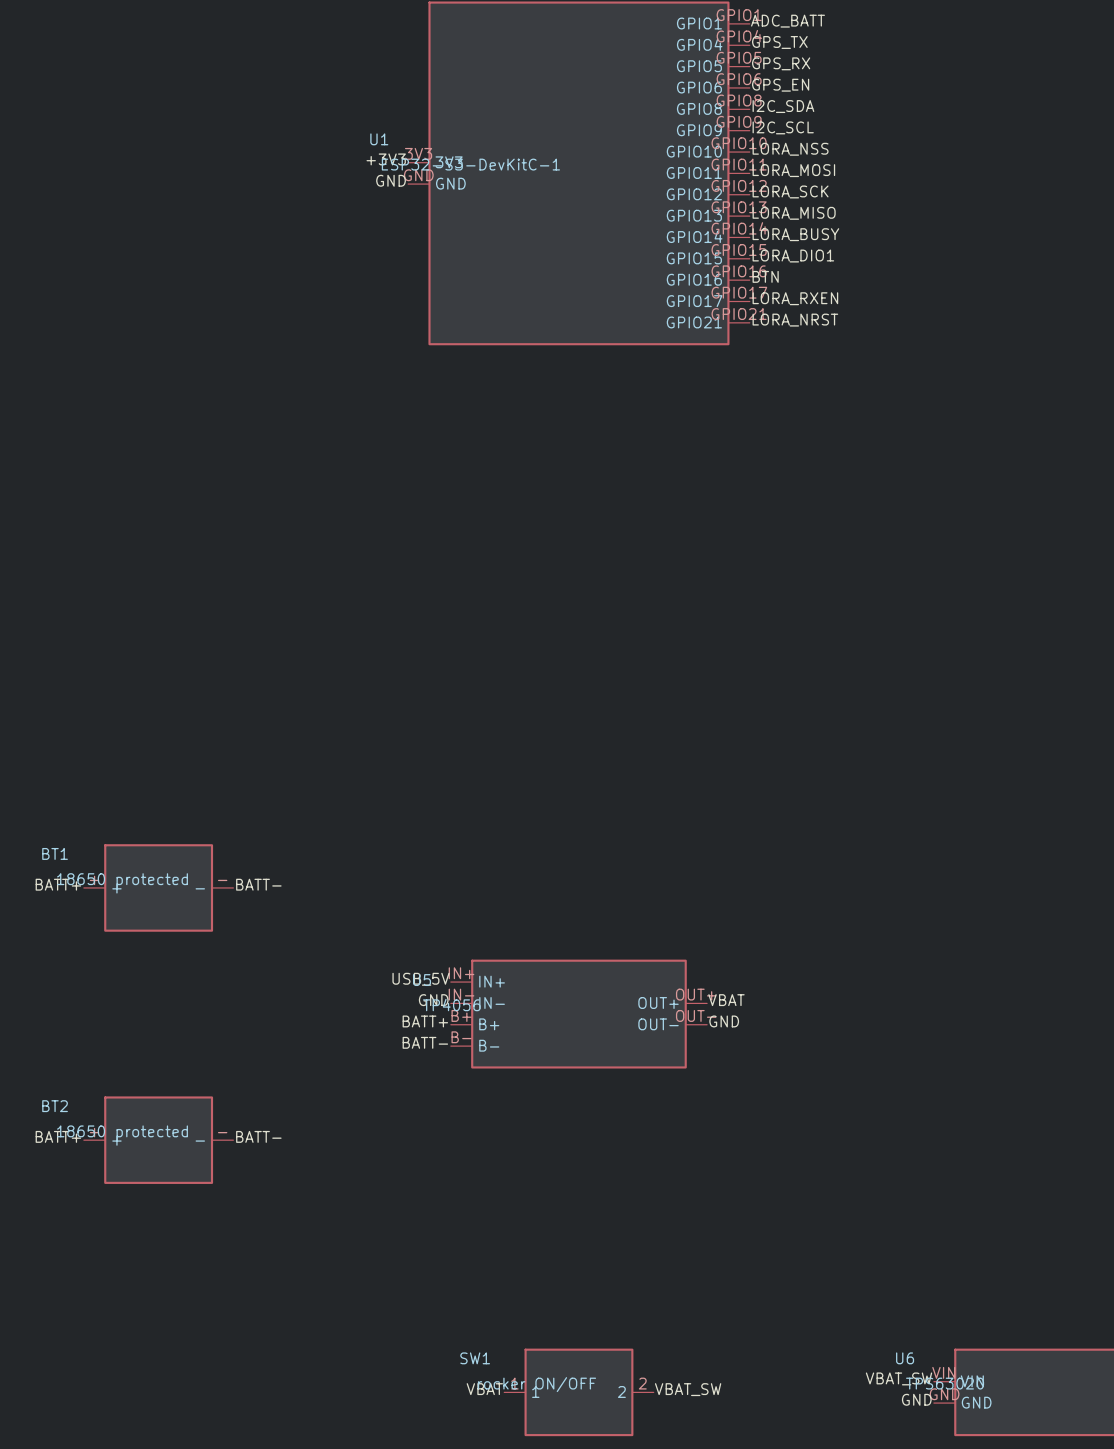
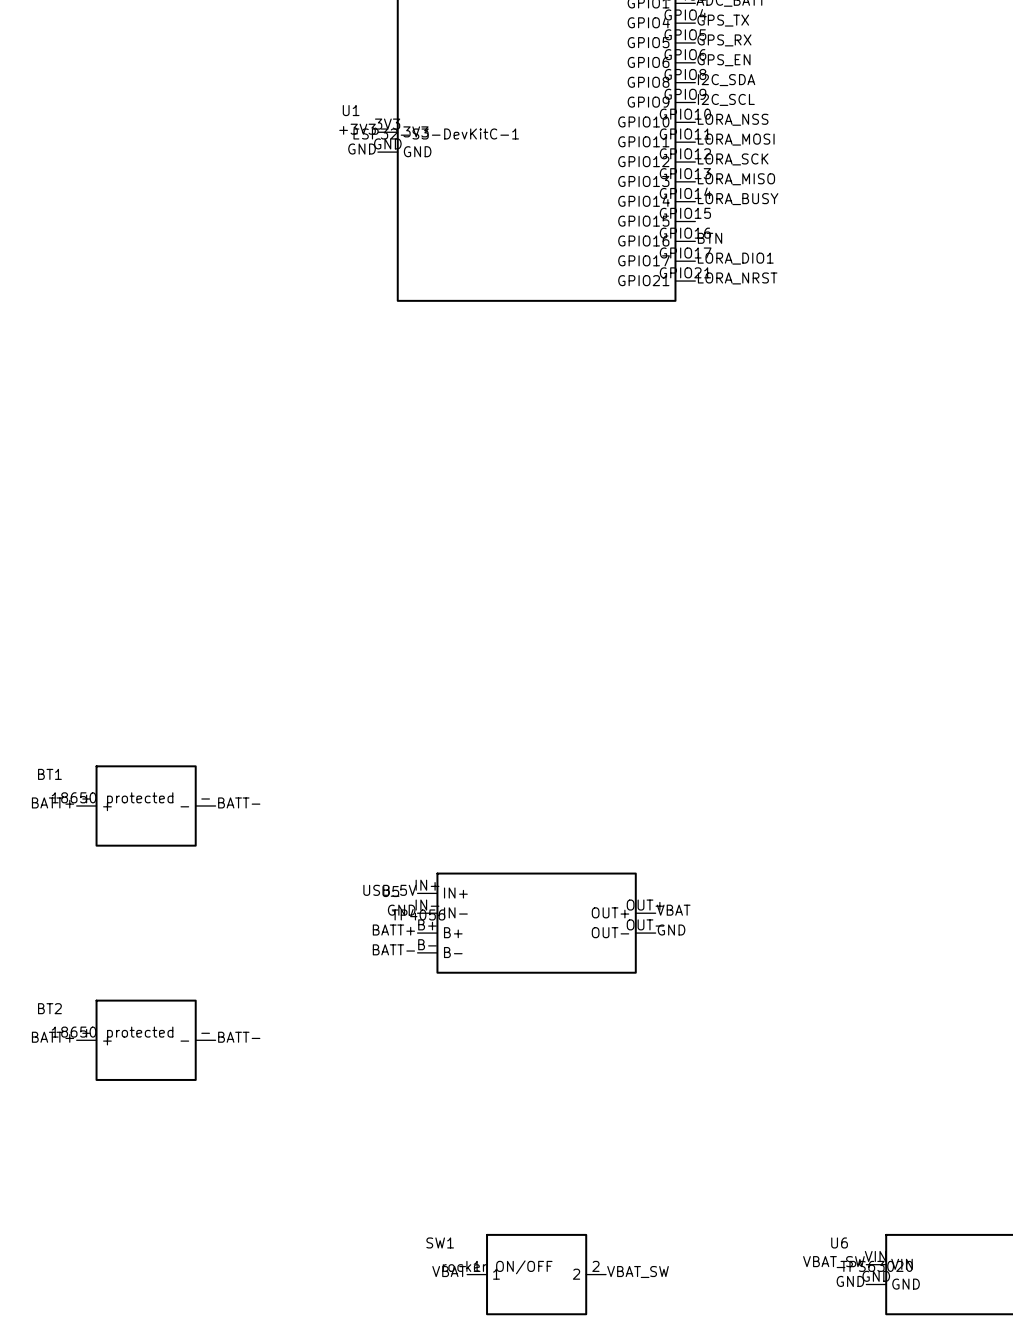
label: LORA_DIO1 (793, 256) -> none
label: LORA_RXEN (795, 298) -> LORA_DIO1 (735, 258)

